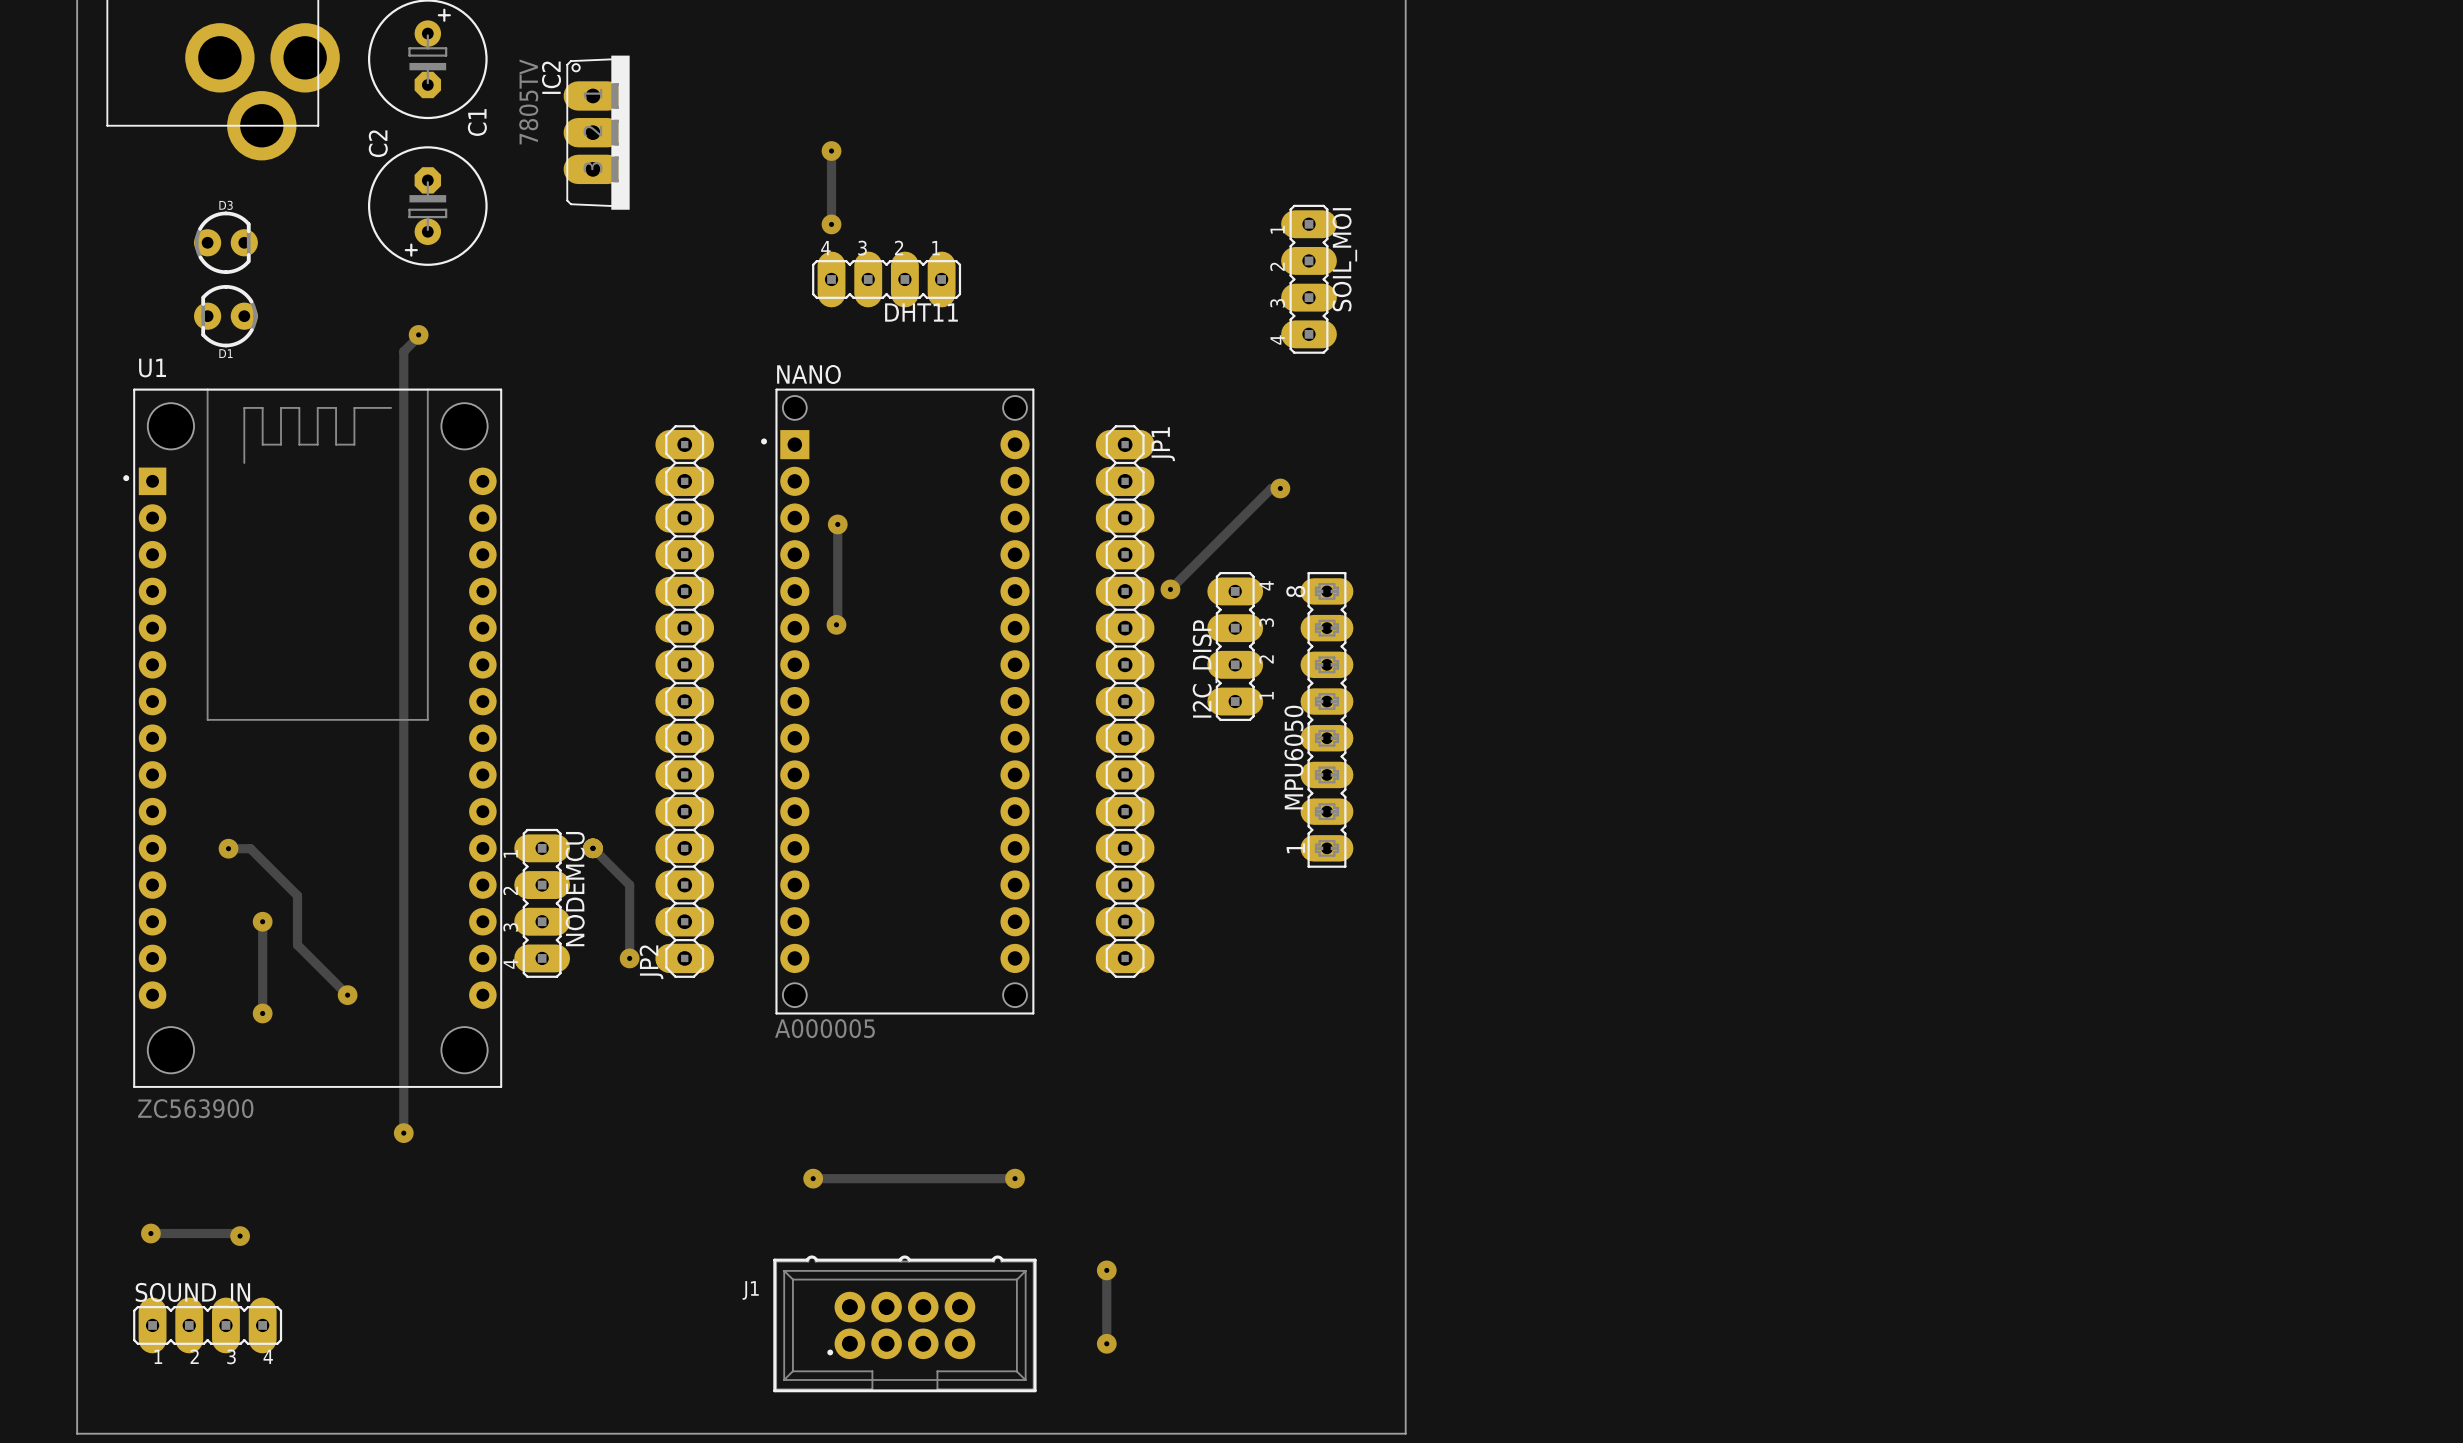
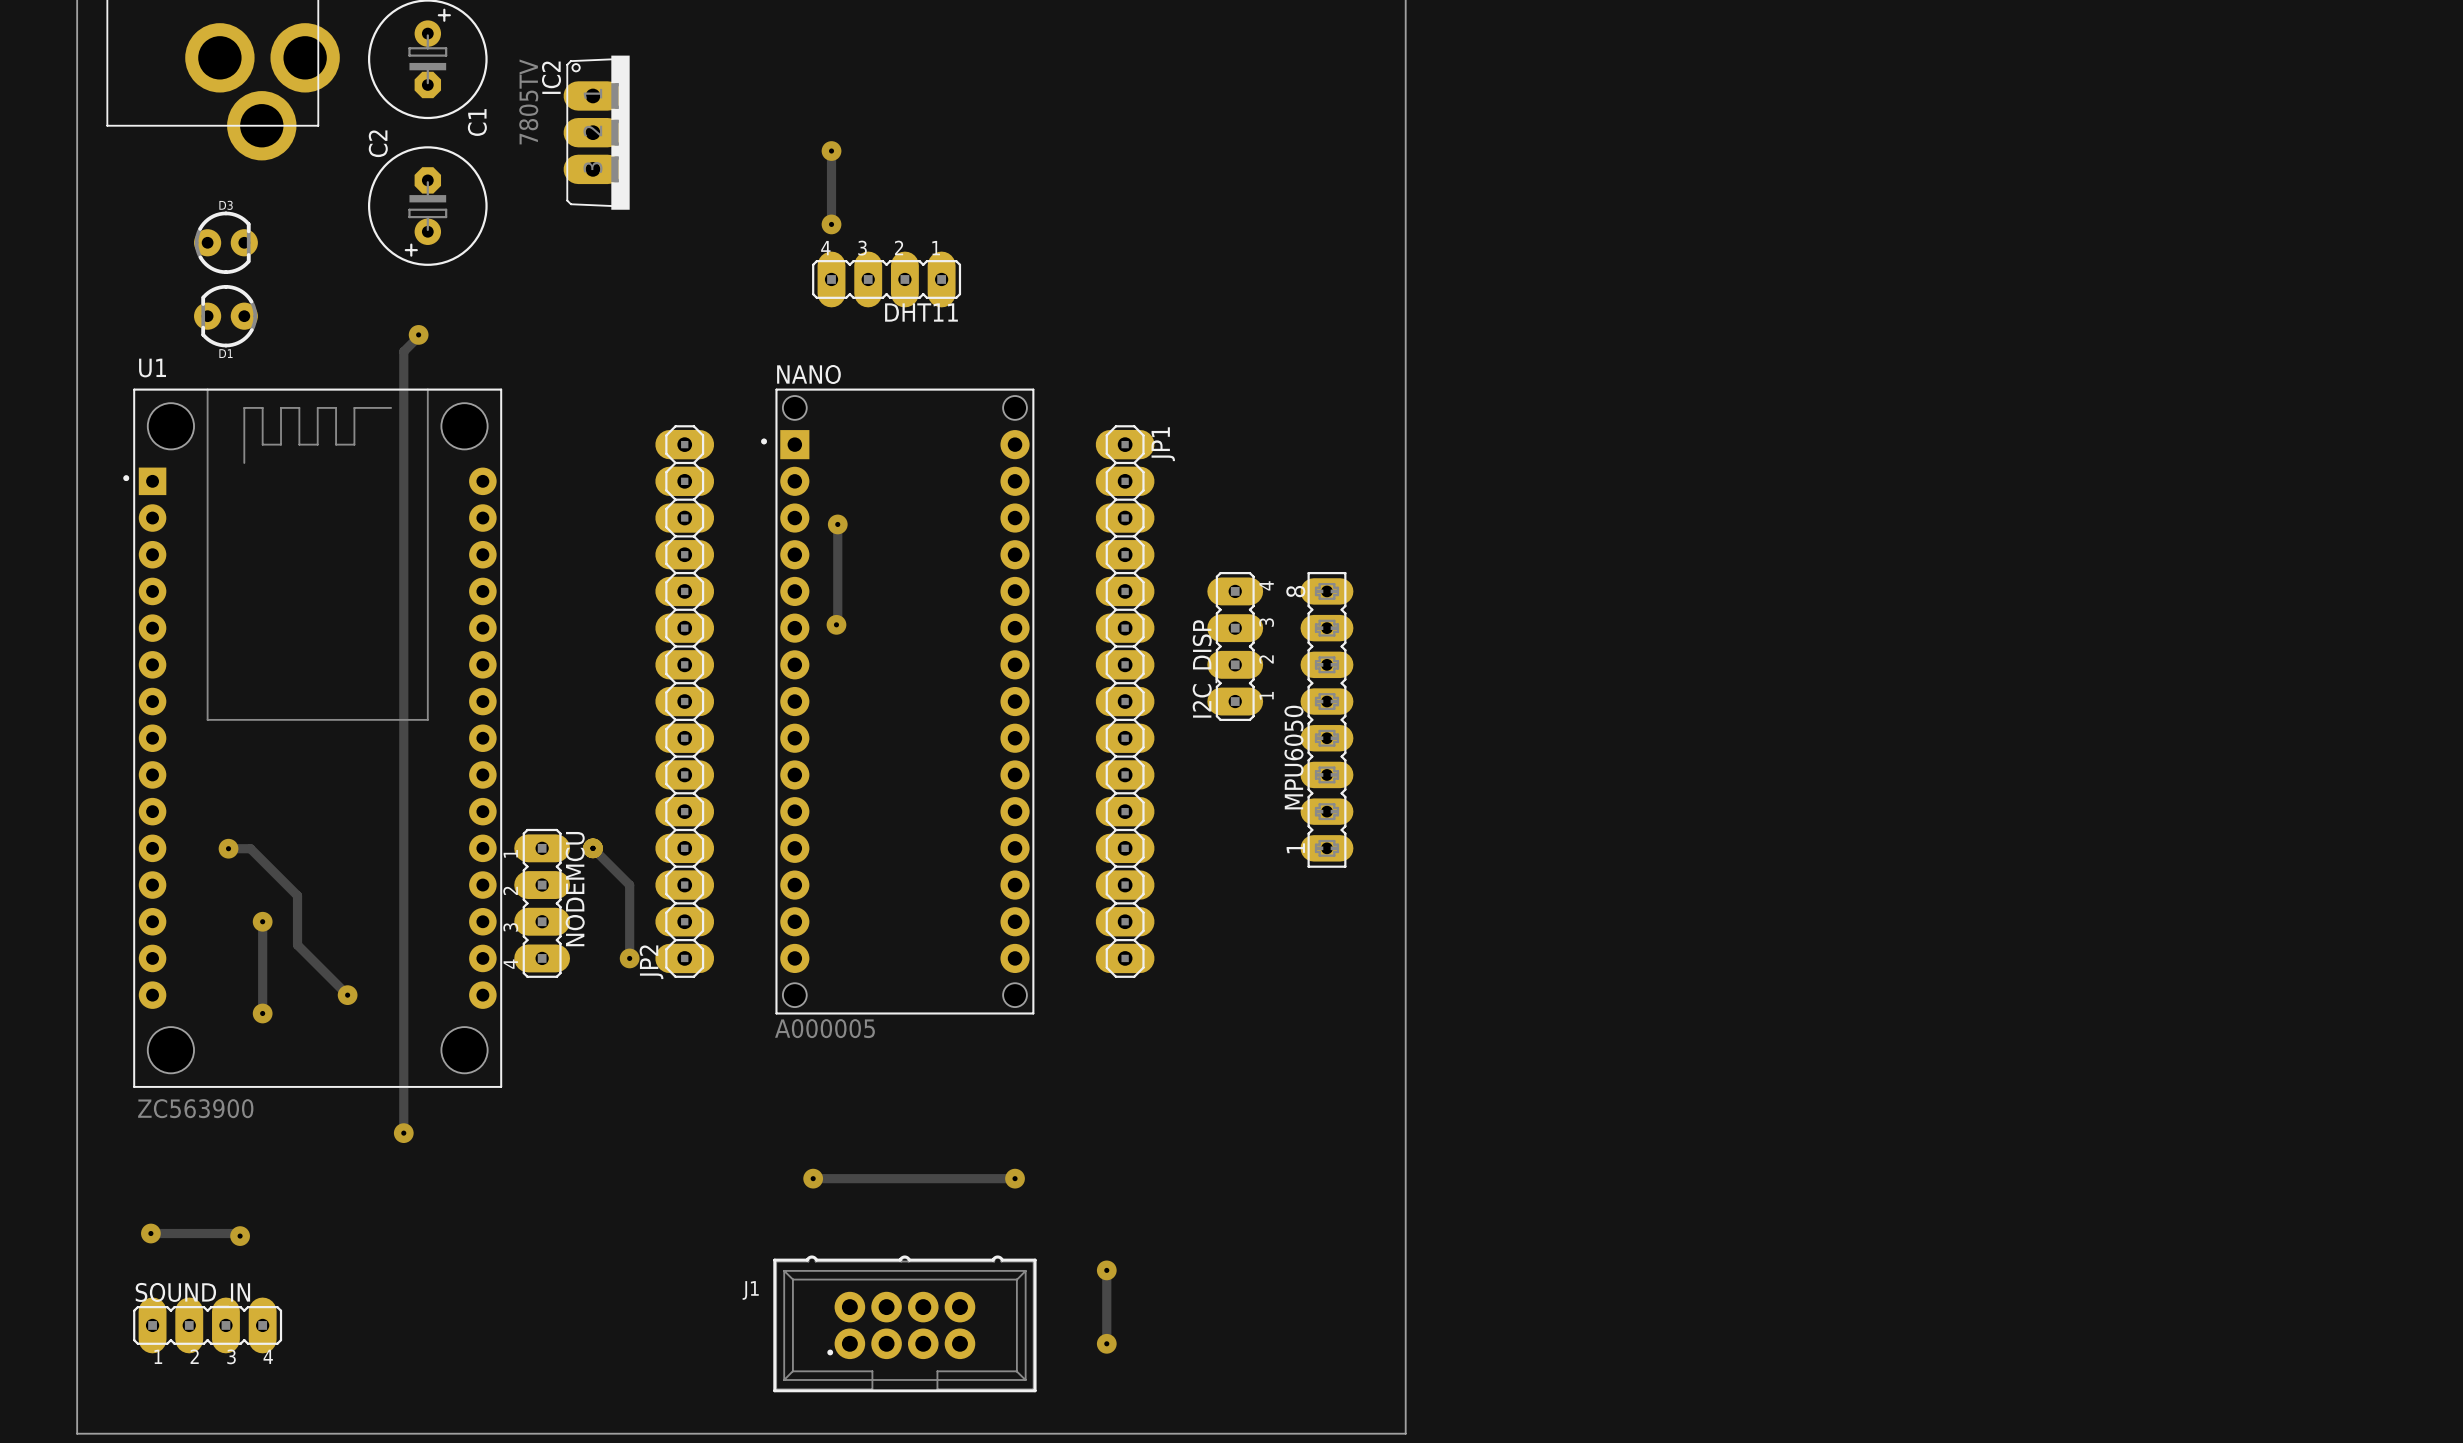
SOIL_MOI: (1309, 279) -> none
track: (1280, 488) (1271, 488) (1170, 589) -> none
via: (1280, 488) -> none
via: (1170, 589) -> none

